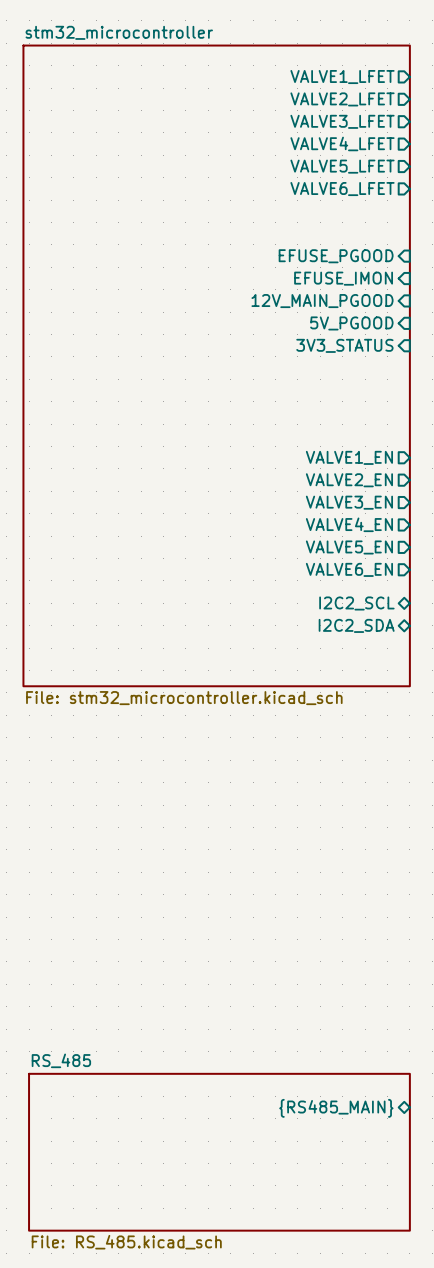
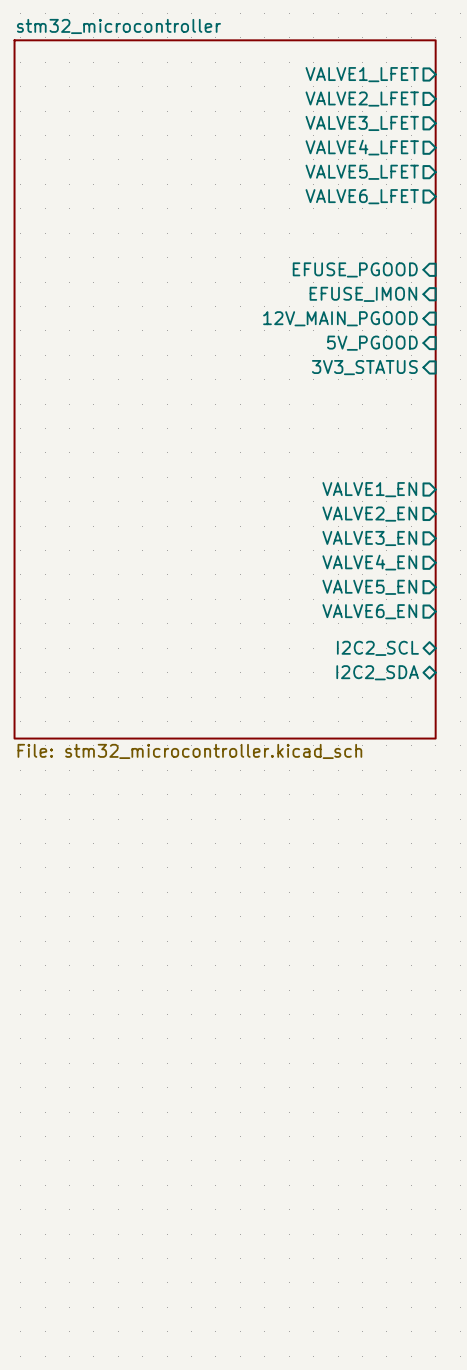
sheet pin: {RS485_MAIN} (336, 1108) -> none
sheet RS_485: File: RS_485.kicad_sch (219, 1152) -> none

